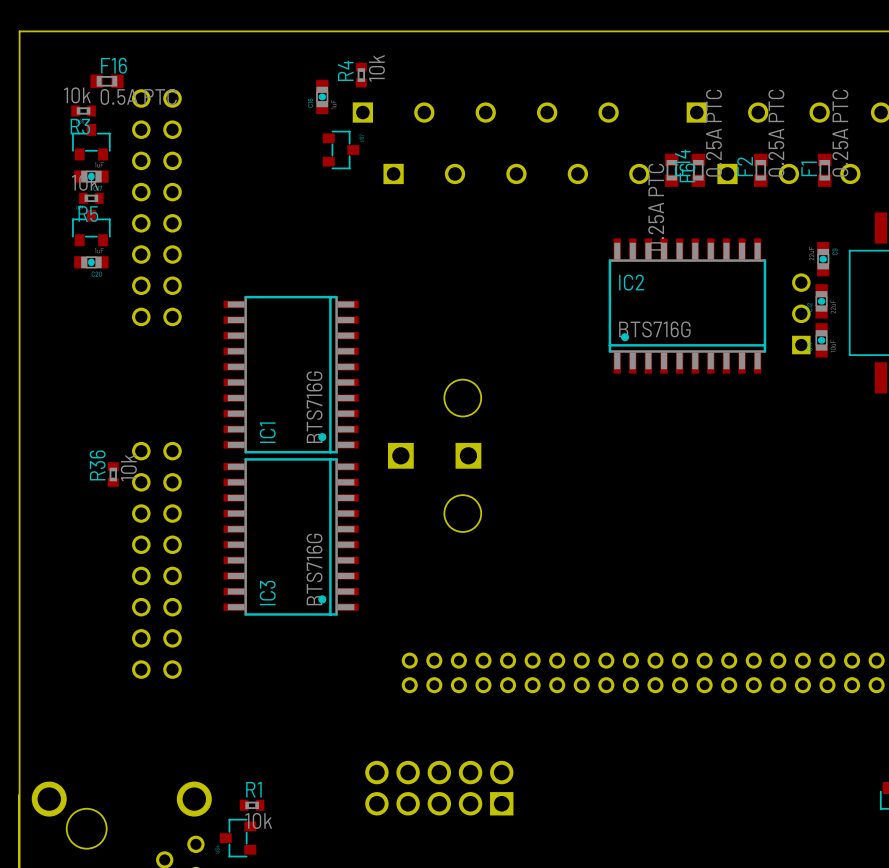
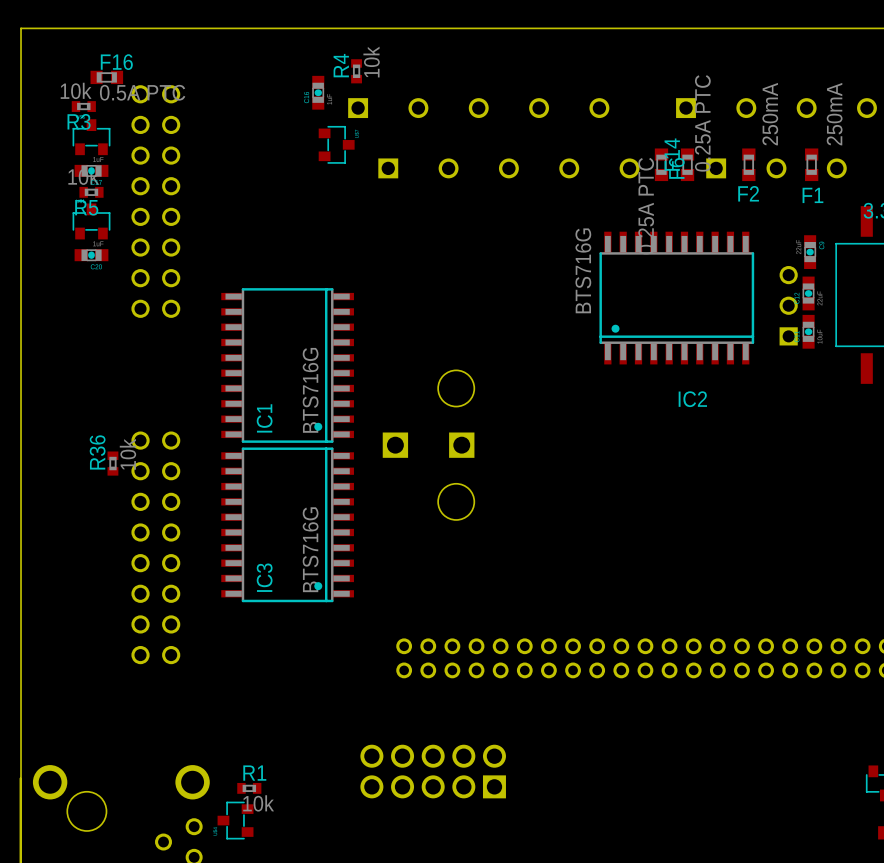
F2 value: 0.25A PTC (776, 133) -> 250mA (770, 114)
F1 value: 0.25A PTC (840, 133) -> 250mA (834, 114)
F2 name rotation: 0° (745, 166) -> 90° clockwise (748, 193)
F2 name position: F2 (745, 166) -> F2 (748, 193)
F1 name rotation: 0° (809, 168) -> 90° clockwise (812, 195)
F1 name position: F1 (809, 168) -> F1 (812, 195)
IC2 name position: IC2 (631, 282) -> IC2 (692, 399)
IC2 value rotation: 0° (654, 329) -> 90° counterclockwise (583, 270)

